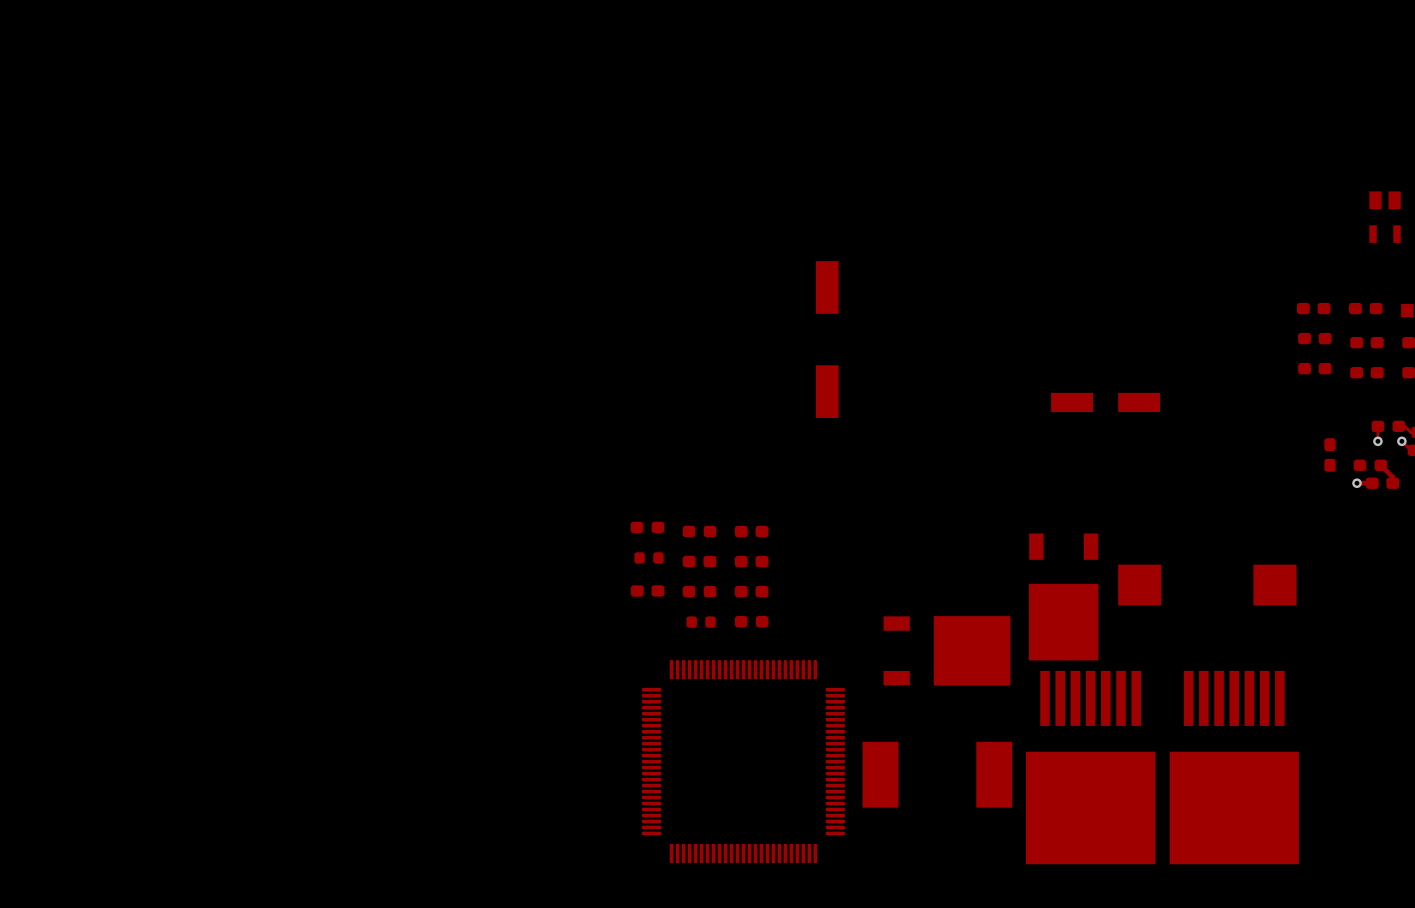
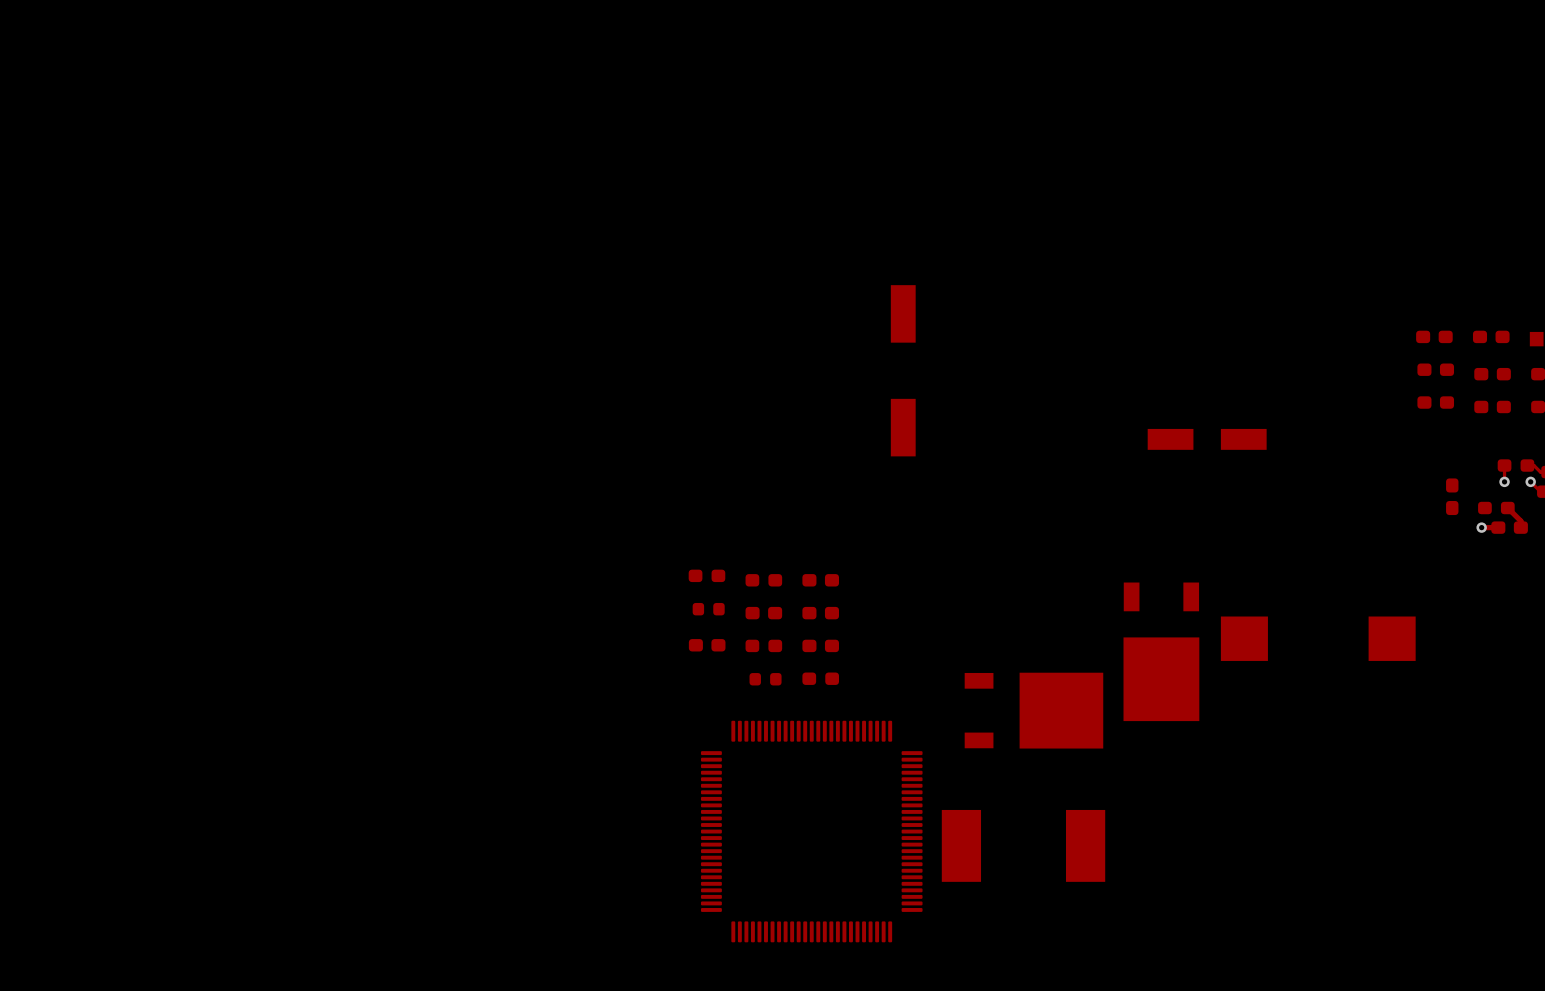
part: (1385, 200) -> none
part: (1385, 234) -> none
part: (1090, 767) -> none
part: (1234, 767) -> none

